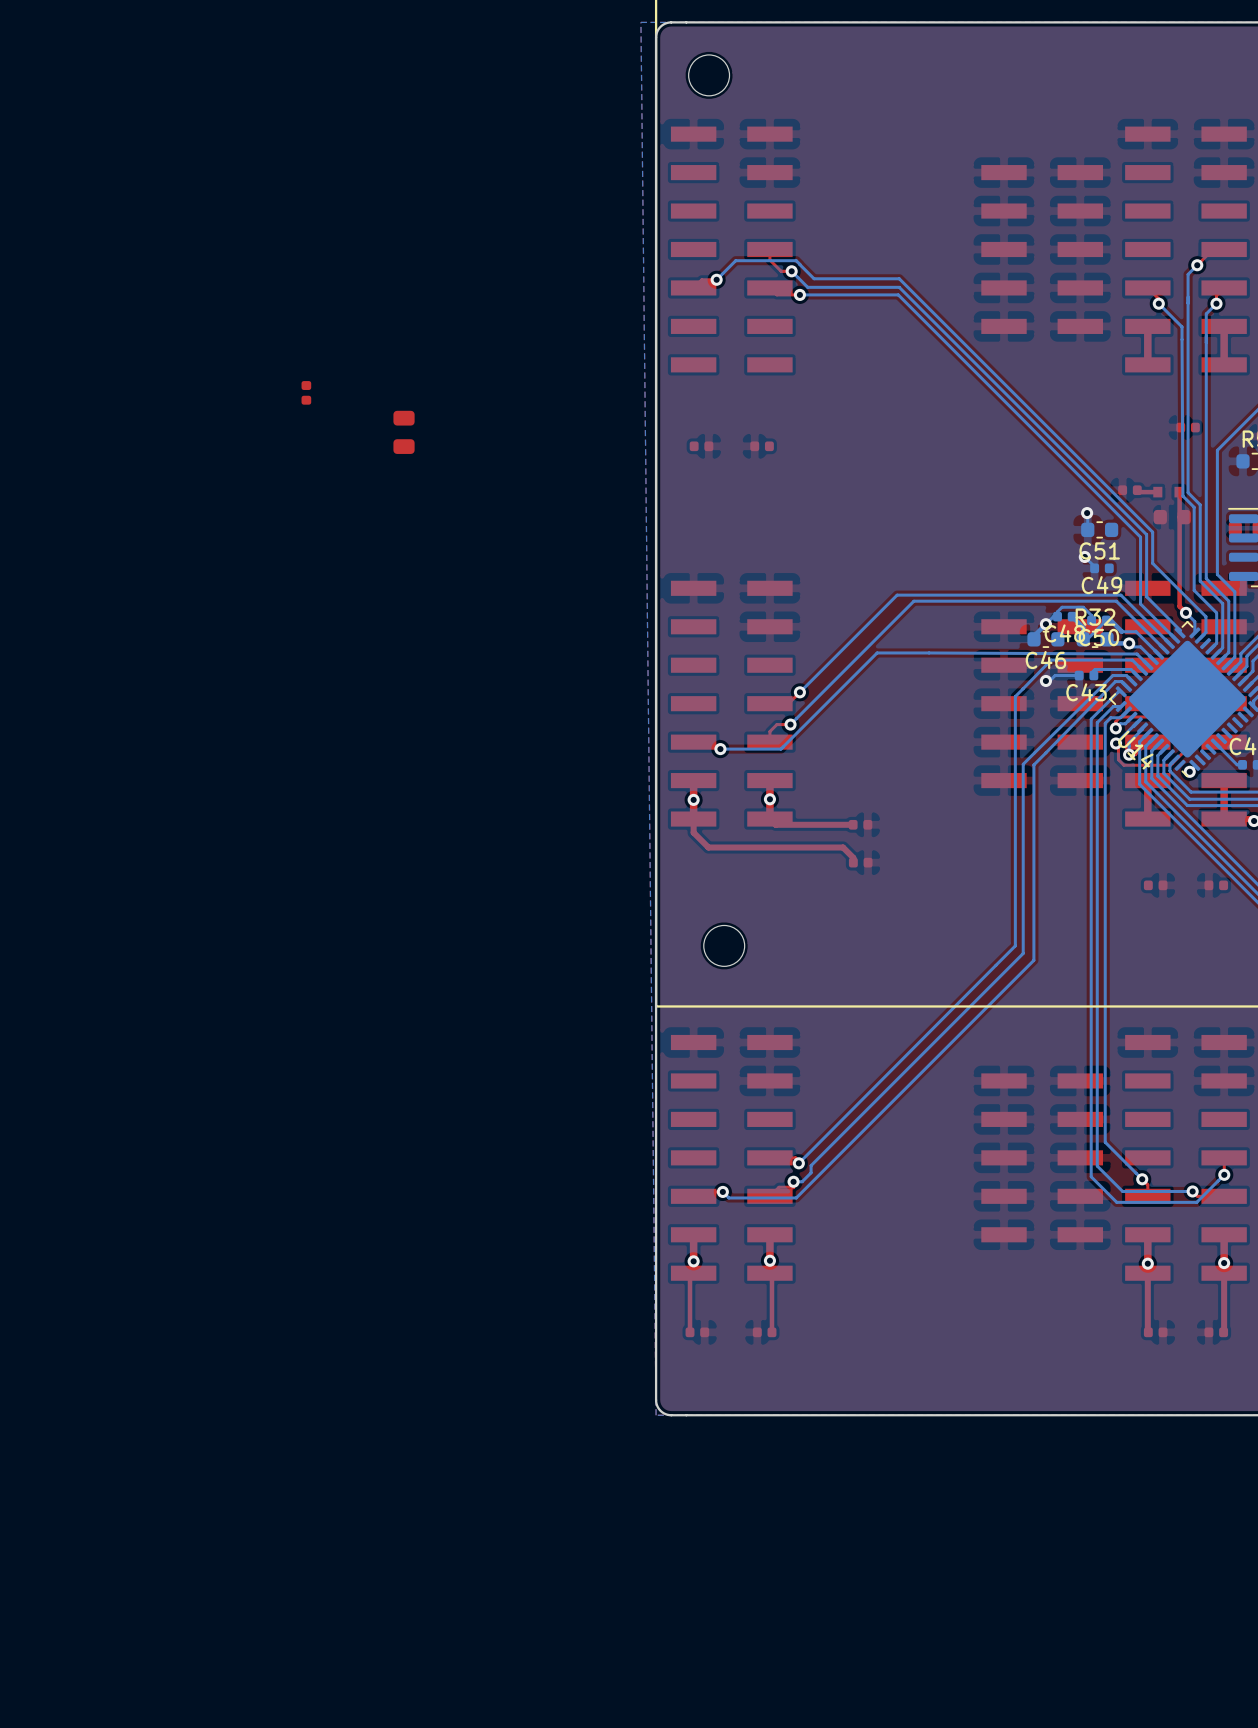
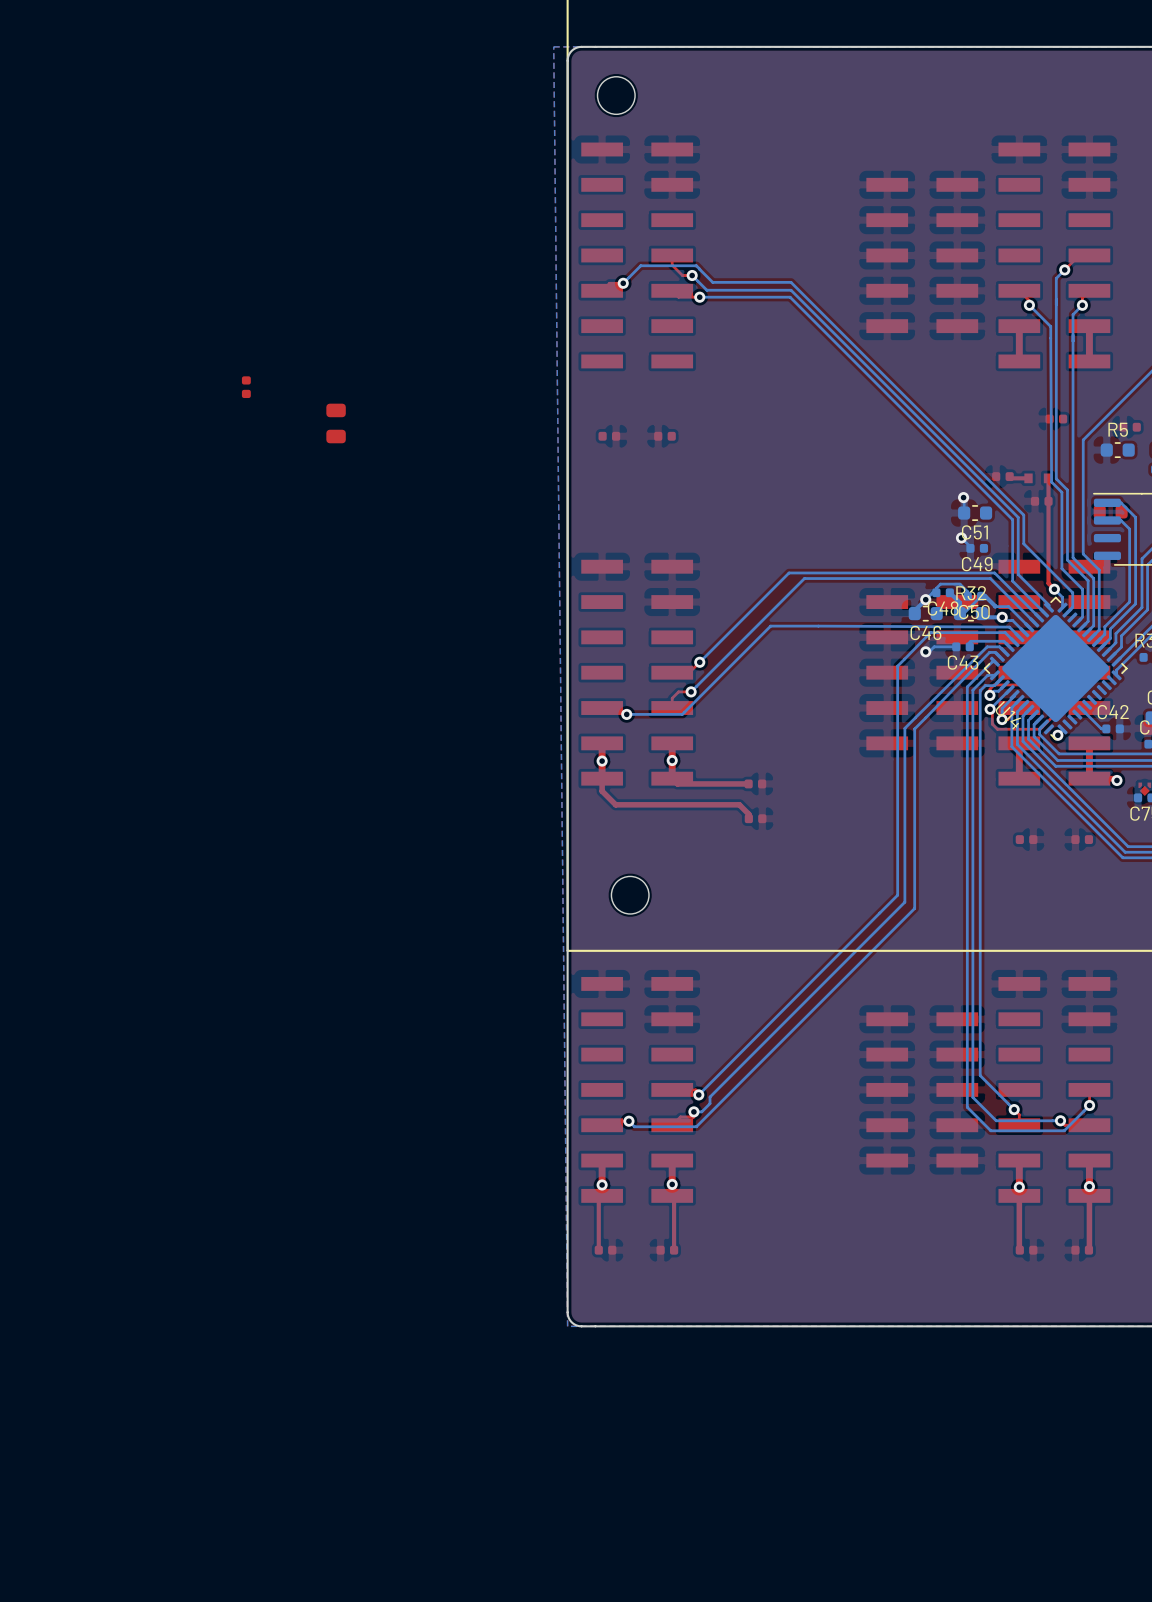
part footprint: [1153, 509, 1191, 525] -> [1030, 496, 1053, 506]

